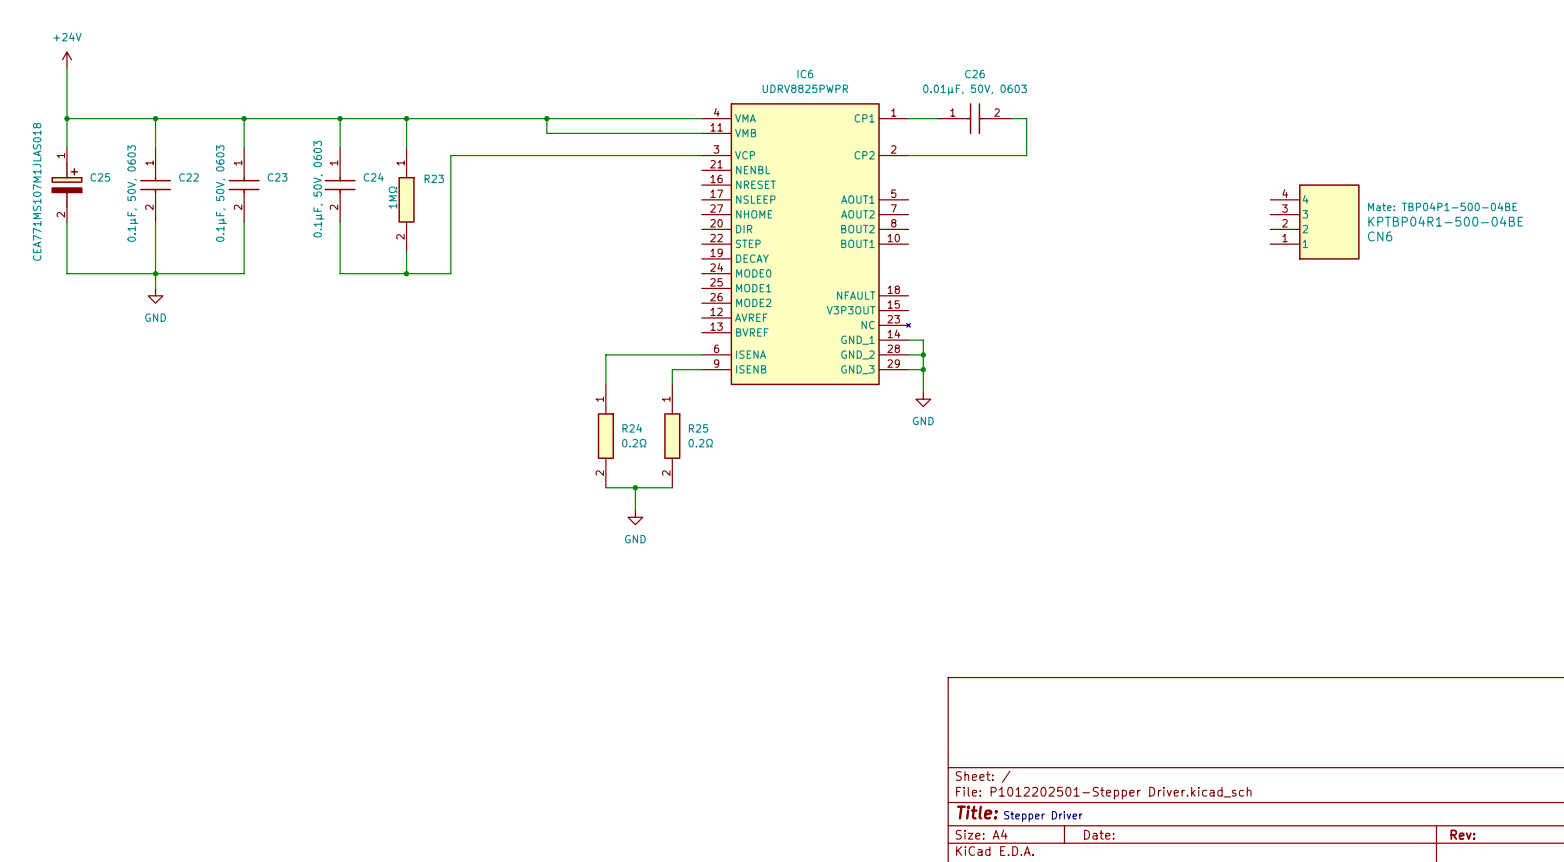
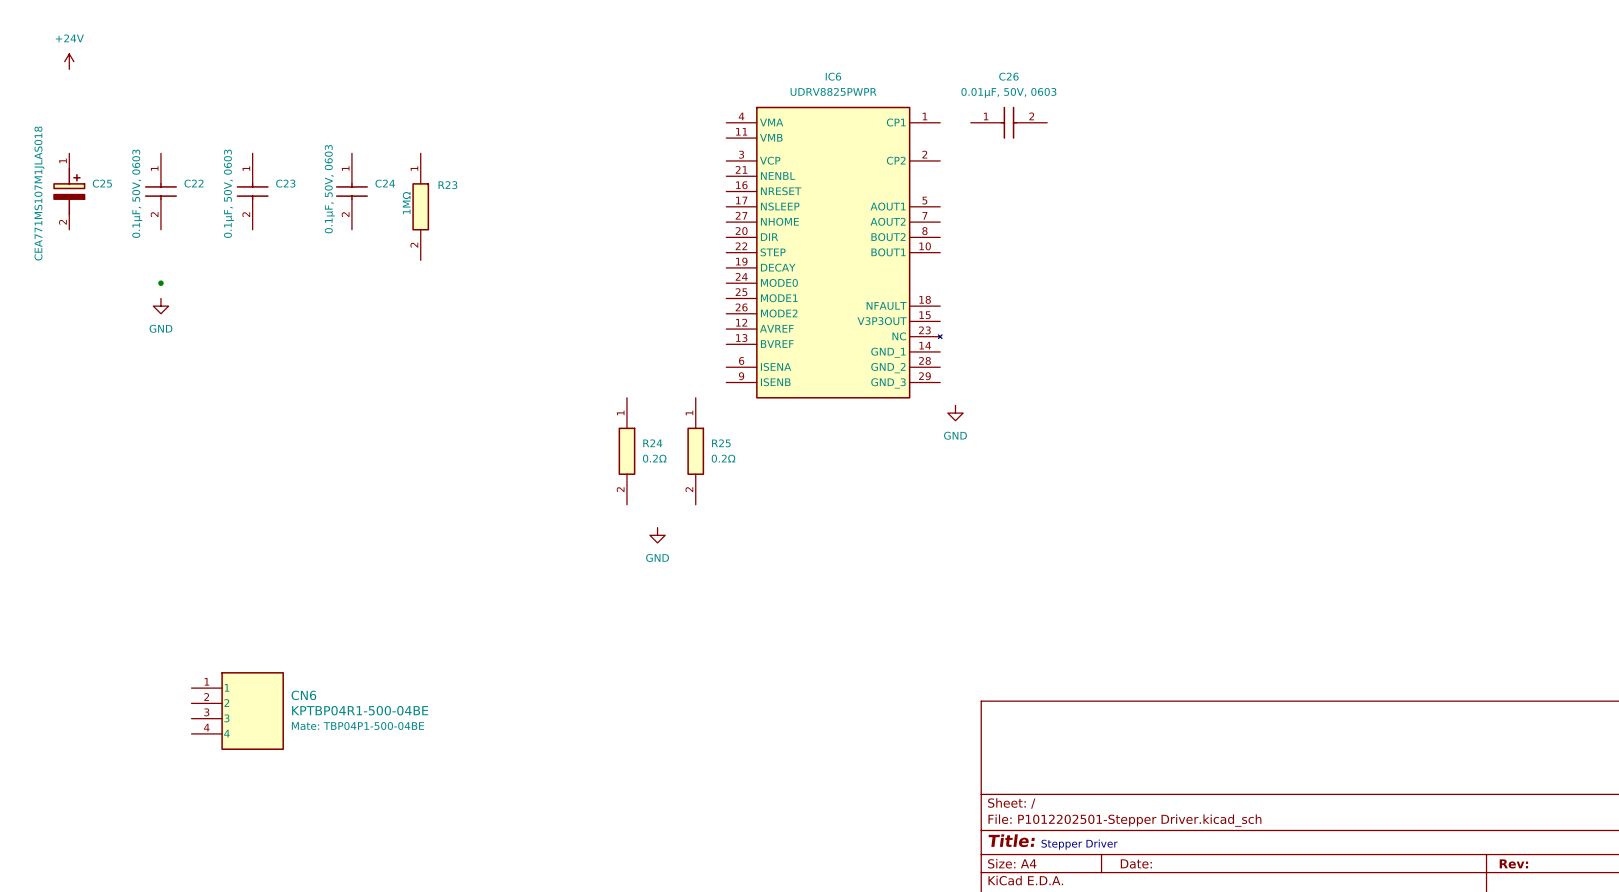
wire: (66, 66) (66, 148) -> none
wire: (66, 118) (701, 118) -> none
junction: (66, 118) -> none
wire: (155, 118) (155, 148) -> none
junction: (155, 118) -> none
wire: (244, 118) (244, 148) -> none
junction: (244, 118) -> none
wire: (340, 118) (340, 148) -> none
junction: (340, 118) -> none
wire: (406, 118) (406, 148) -> none
junction: (406, 118) -> none
wire: (546, 118) (546, 133) (701, 133) -> none
junction: (546, 118) -> none
wire: (908, 118) (938, 118) -> none
wire: (1011, 118) (1026, 118) (1026, 155) (908, 155) -> none
wire: (701, 155) (450, 155) (450, 273) (340, 273) (340, 221) -> none
wire: (66, 221) (66, 273) (244, 273) (244, 221) -> none
wire: (155, 221) (155, 288) -> none
CN6 position: (1314, 221) -> (237, 711)
CN6 flip: as is (1329, 221) -> up-down (252, 711)
wire: (406, 251) (406, 273) -> none
junction: (406, 273) -> none
wire: (908, 340) (923, 340) (923, 391) -> none
wire: (701, 354) (605, 354) (605, 384) -> none
wire: (908, 354) (923, 354) -> none
junction: (923, 354) -> none
wire: (701, 369) (672, 369) (672, 384) -> none
wire: (908, 369) (923, 369) -> none
junction: (923, 369) -> none
wire: (605, 487) (672, 487) -> none
wire: (635, 487) (635, 509) -> none
junction: (635, 487) -> none

